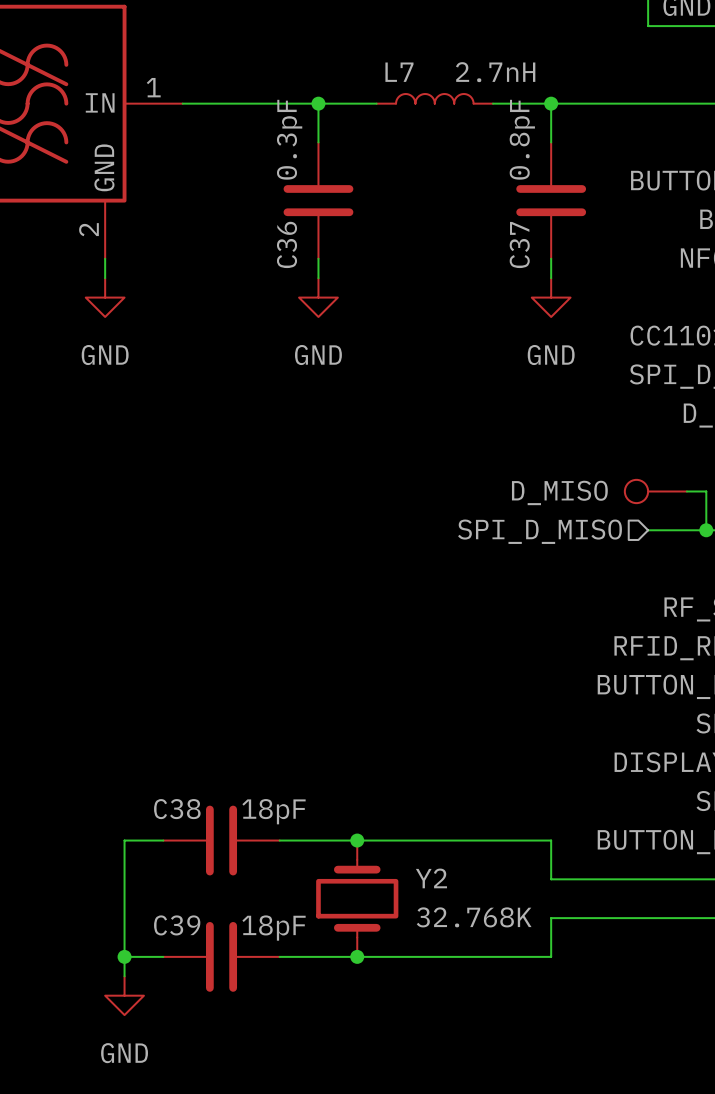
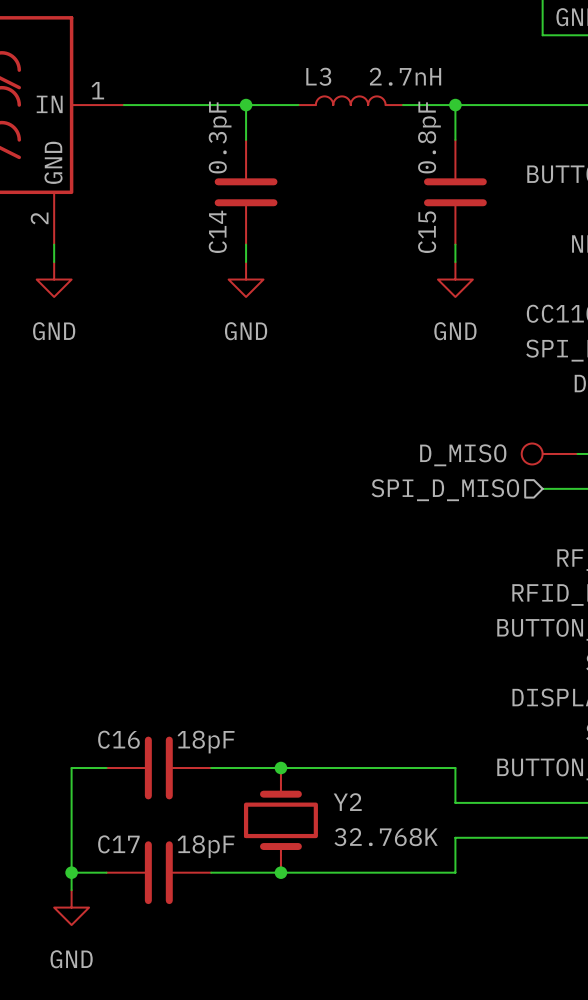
L7 name: L7 (399, 72) -> L3 (318, 76)
C36 name: C36 (287, 244) -> C14 (217, 231)
C37 name: C37 (519, 245) -> C15 (427, 232)
C38 name: C38 (177, 809) -> C16 (118, 739)
C39 name: C39 (177, 925) -> C17 (118, 844)

